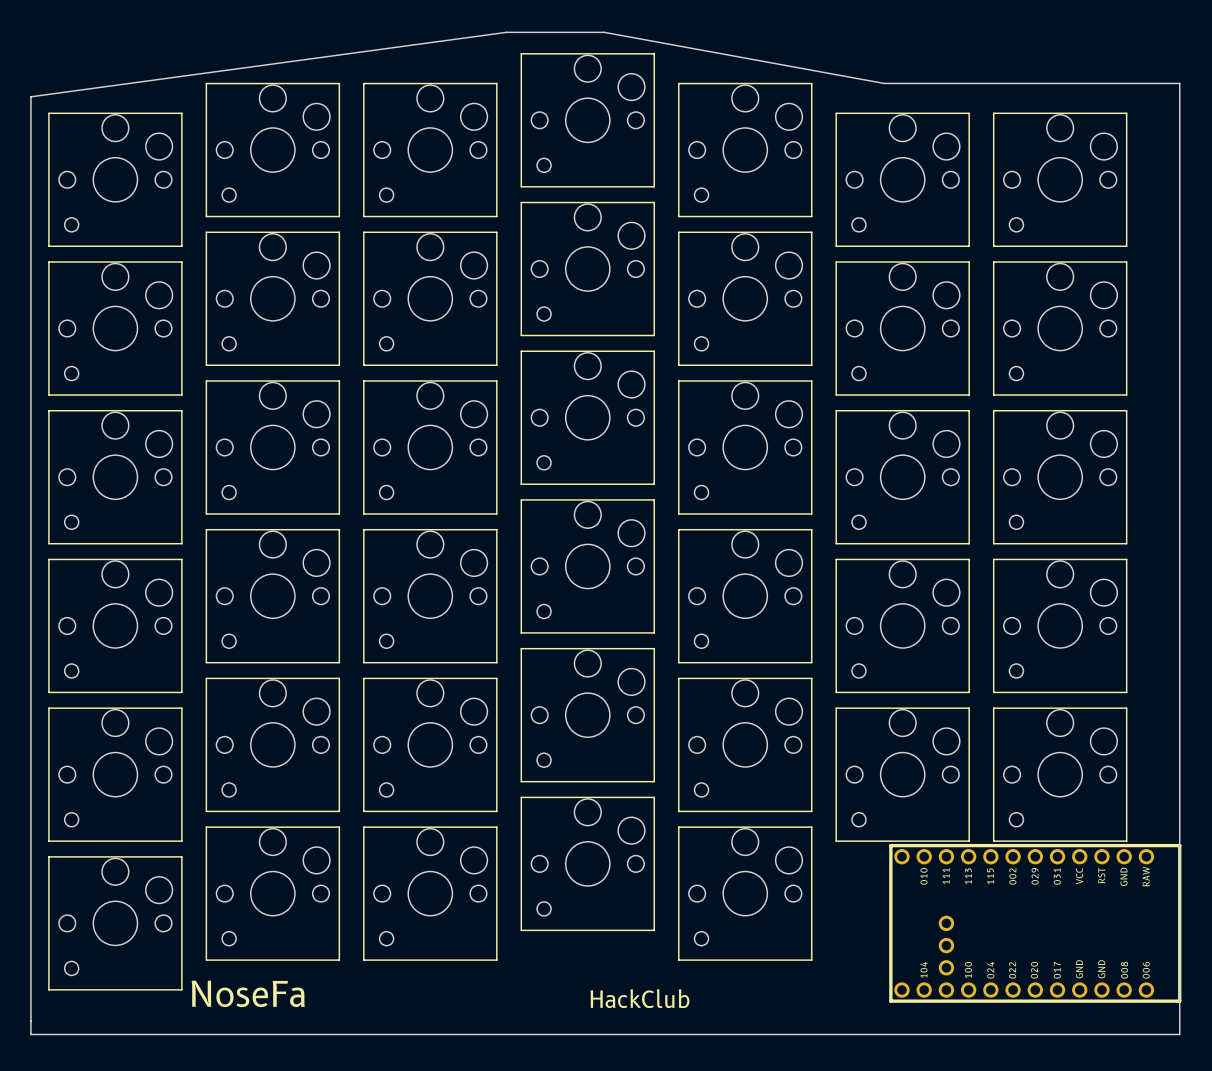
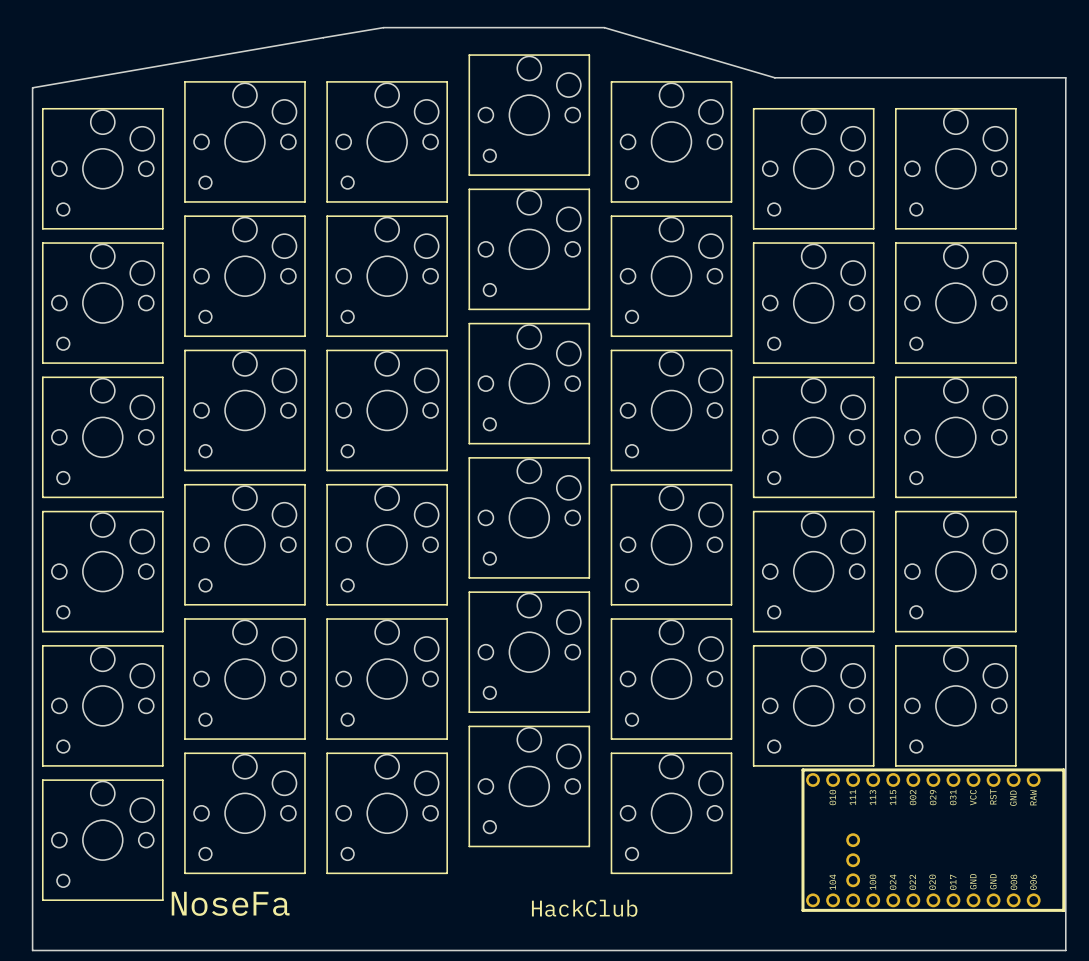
board edge: (506, 32) (30, 96) (30, 1034) (1179, 1034) (1179, 83) (884, 83) (604, 32) (506, 32) -> (383, 27) (32, 87) (32, 950) (1065, 950) (1065, 77) (774, 77) (604, 27) (383, 27)

